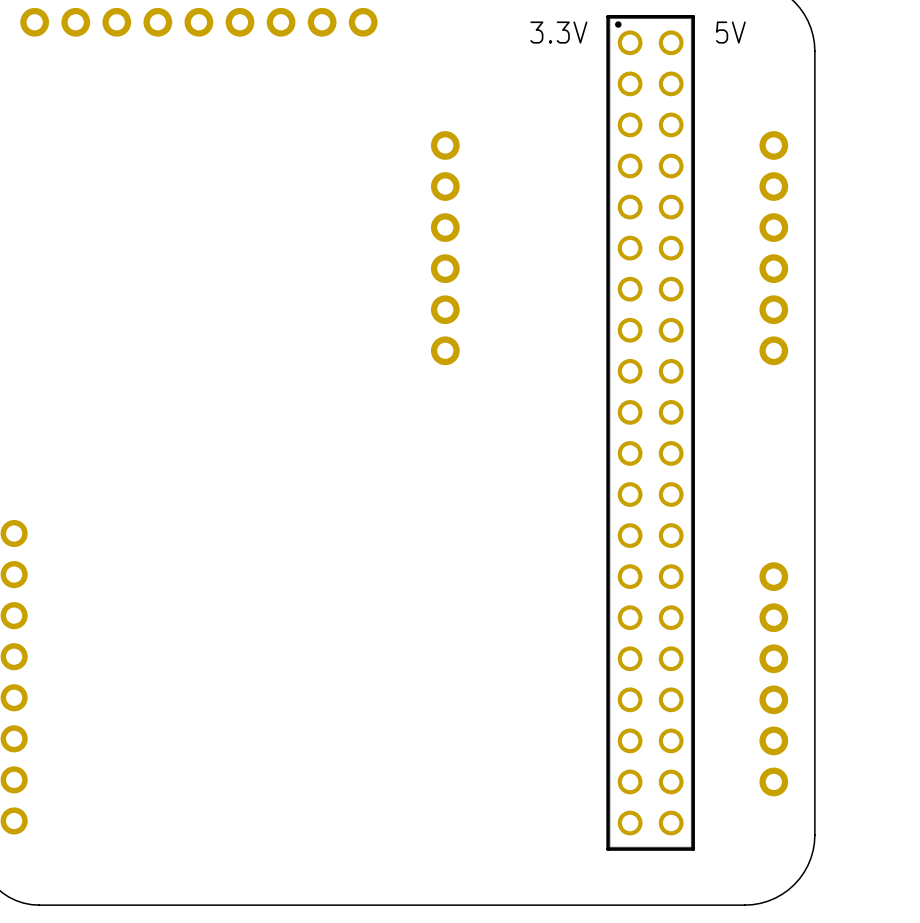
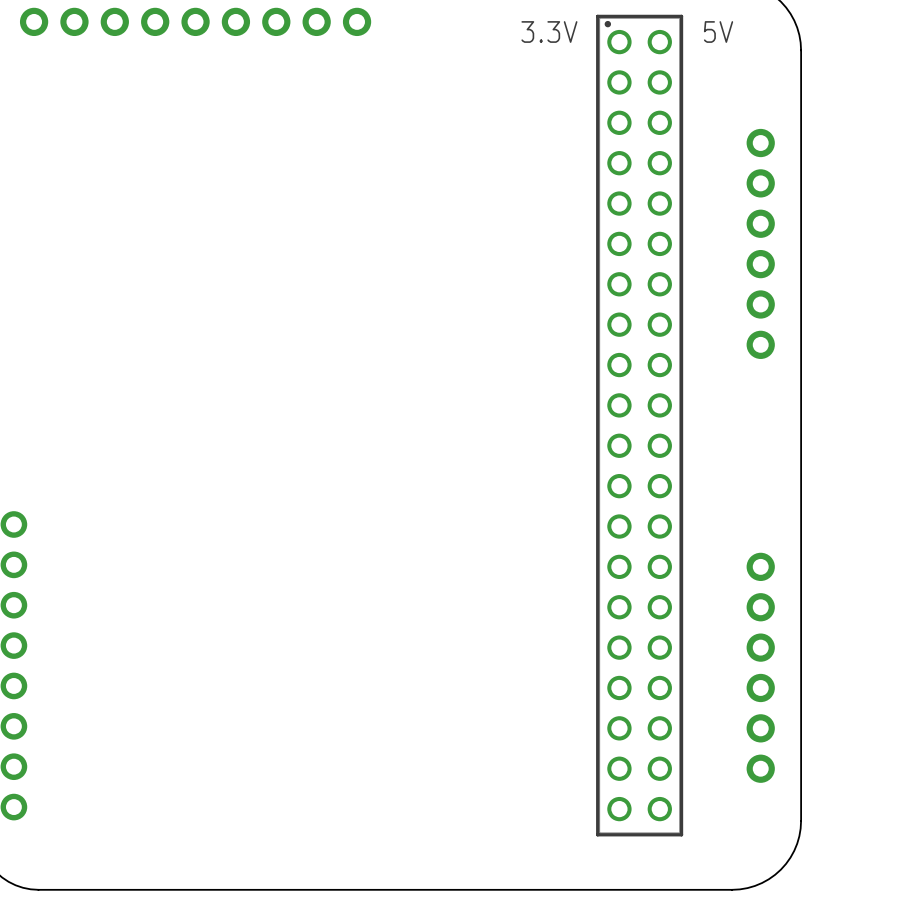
part: (445, 248) -> none

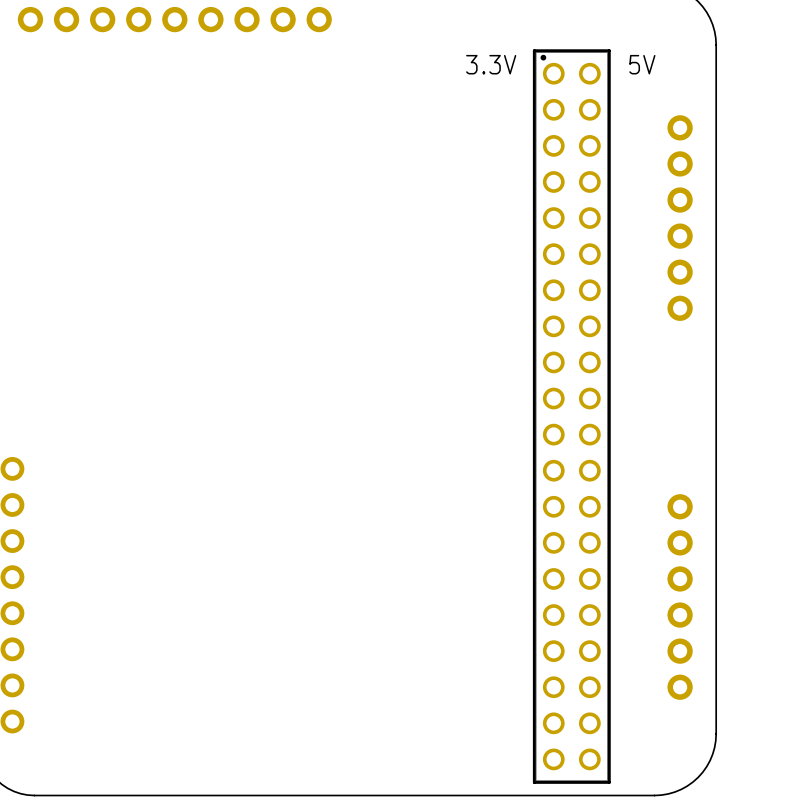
text position: 3.3V (549, 31) -> 3.3V (491, 64)
text position: 5V (718, 31) -> 5V (642, 64)
part position: (639, 425) -> (571, 416)

